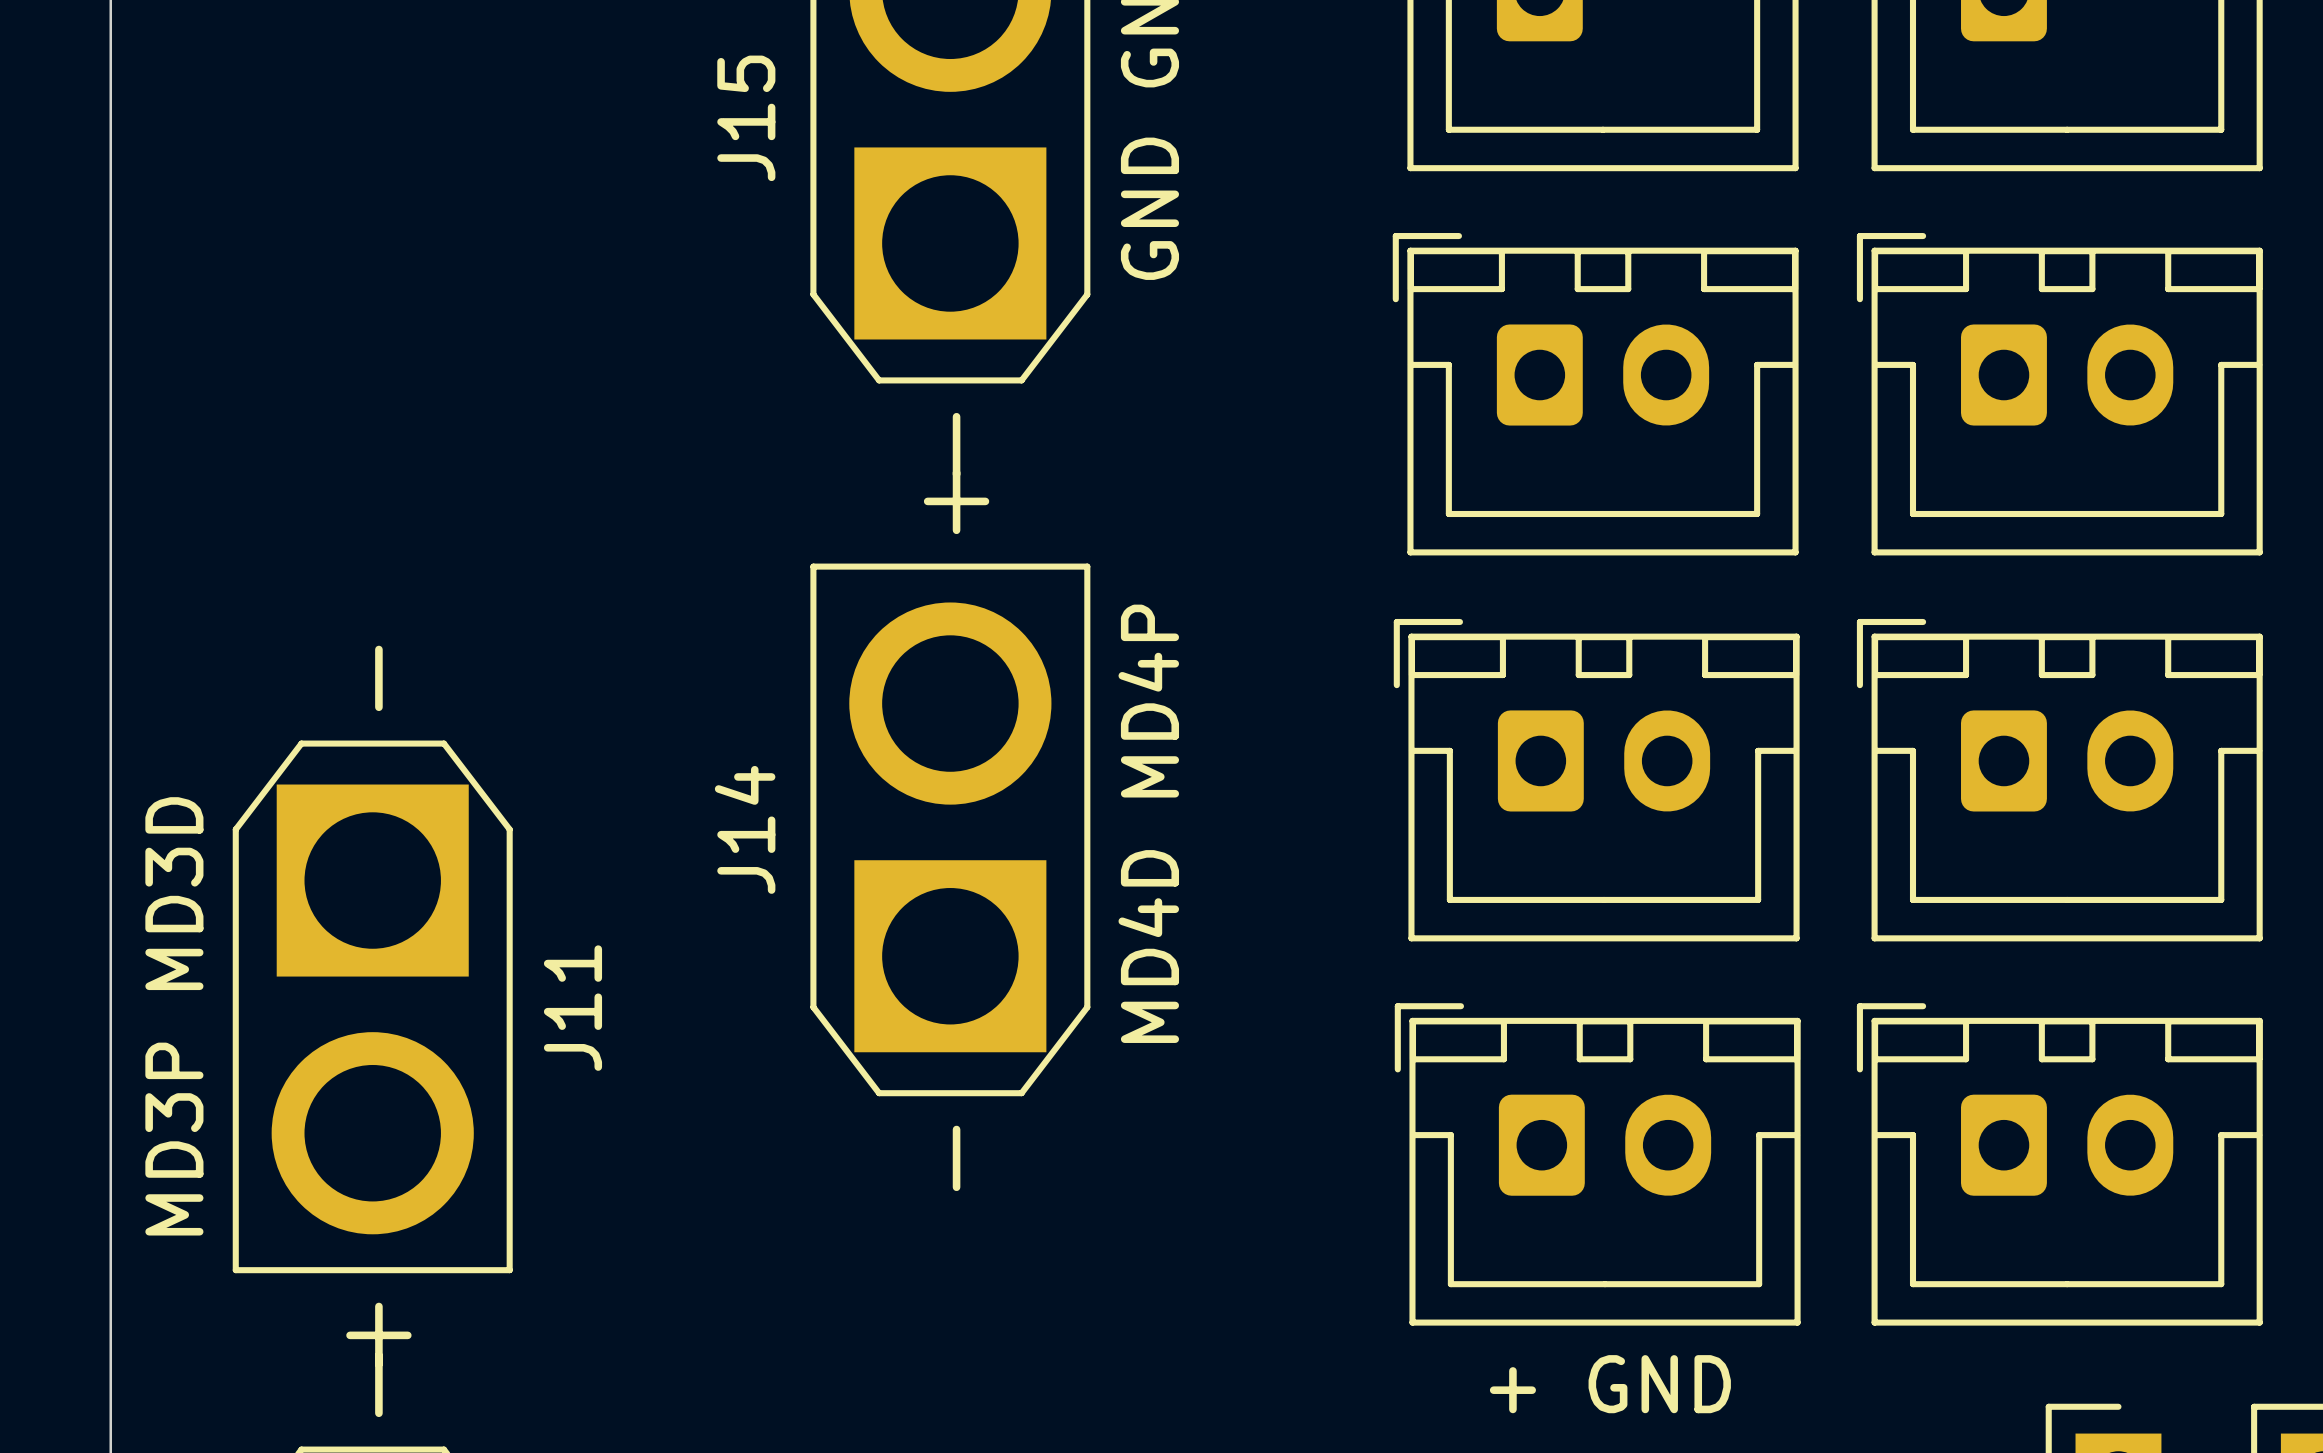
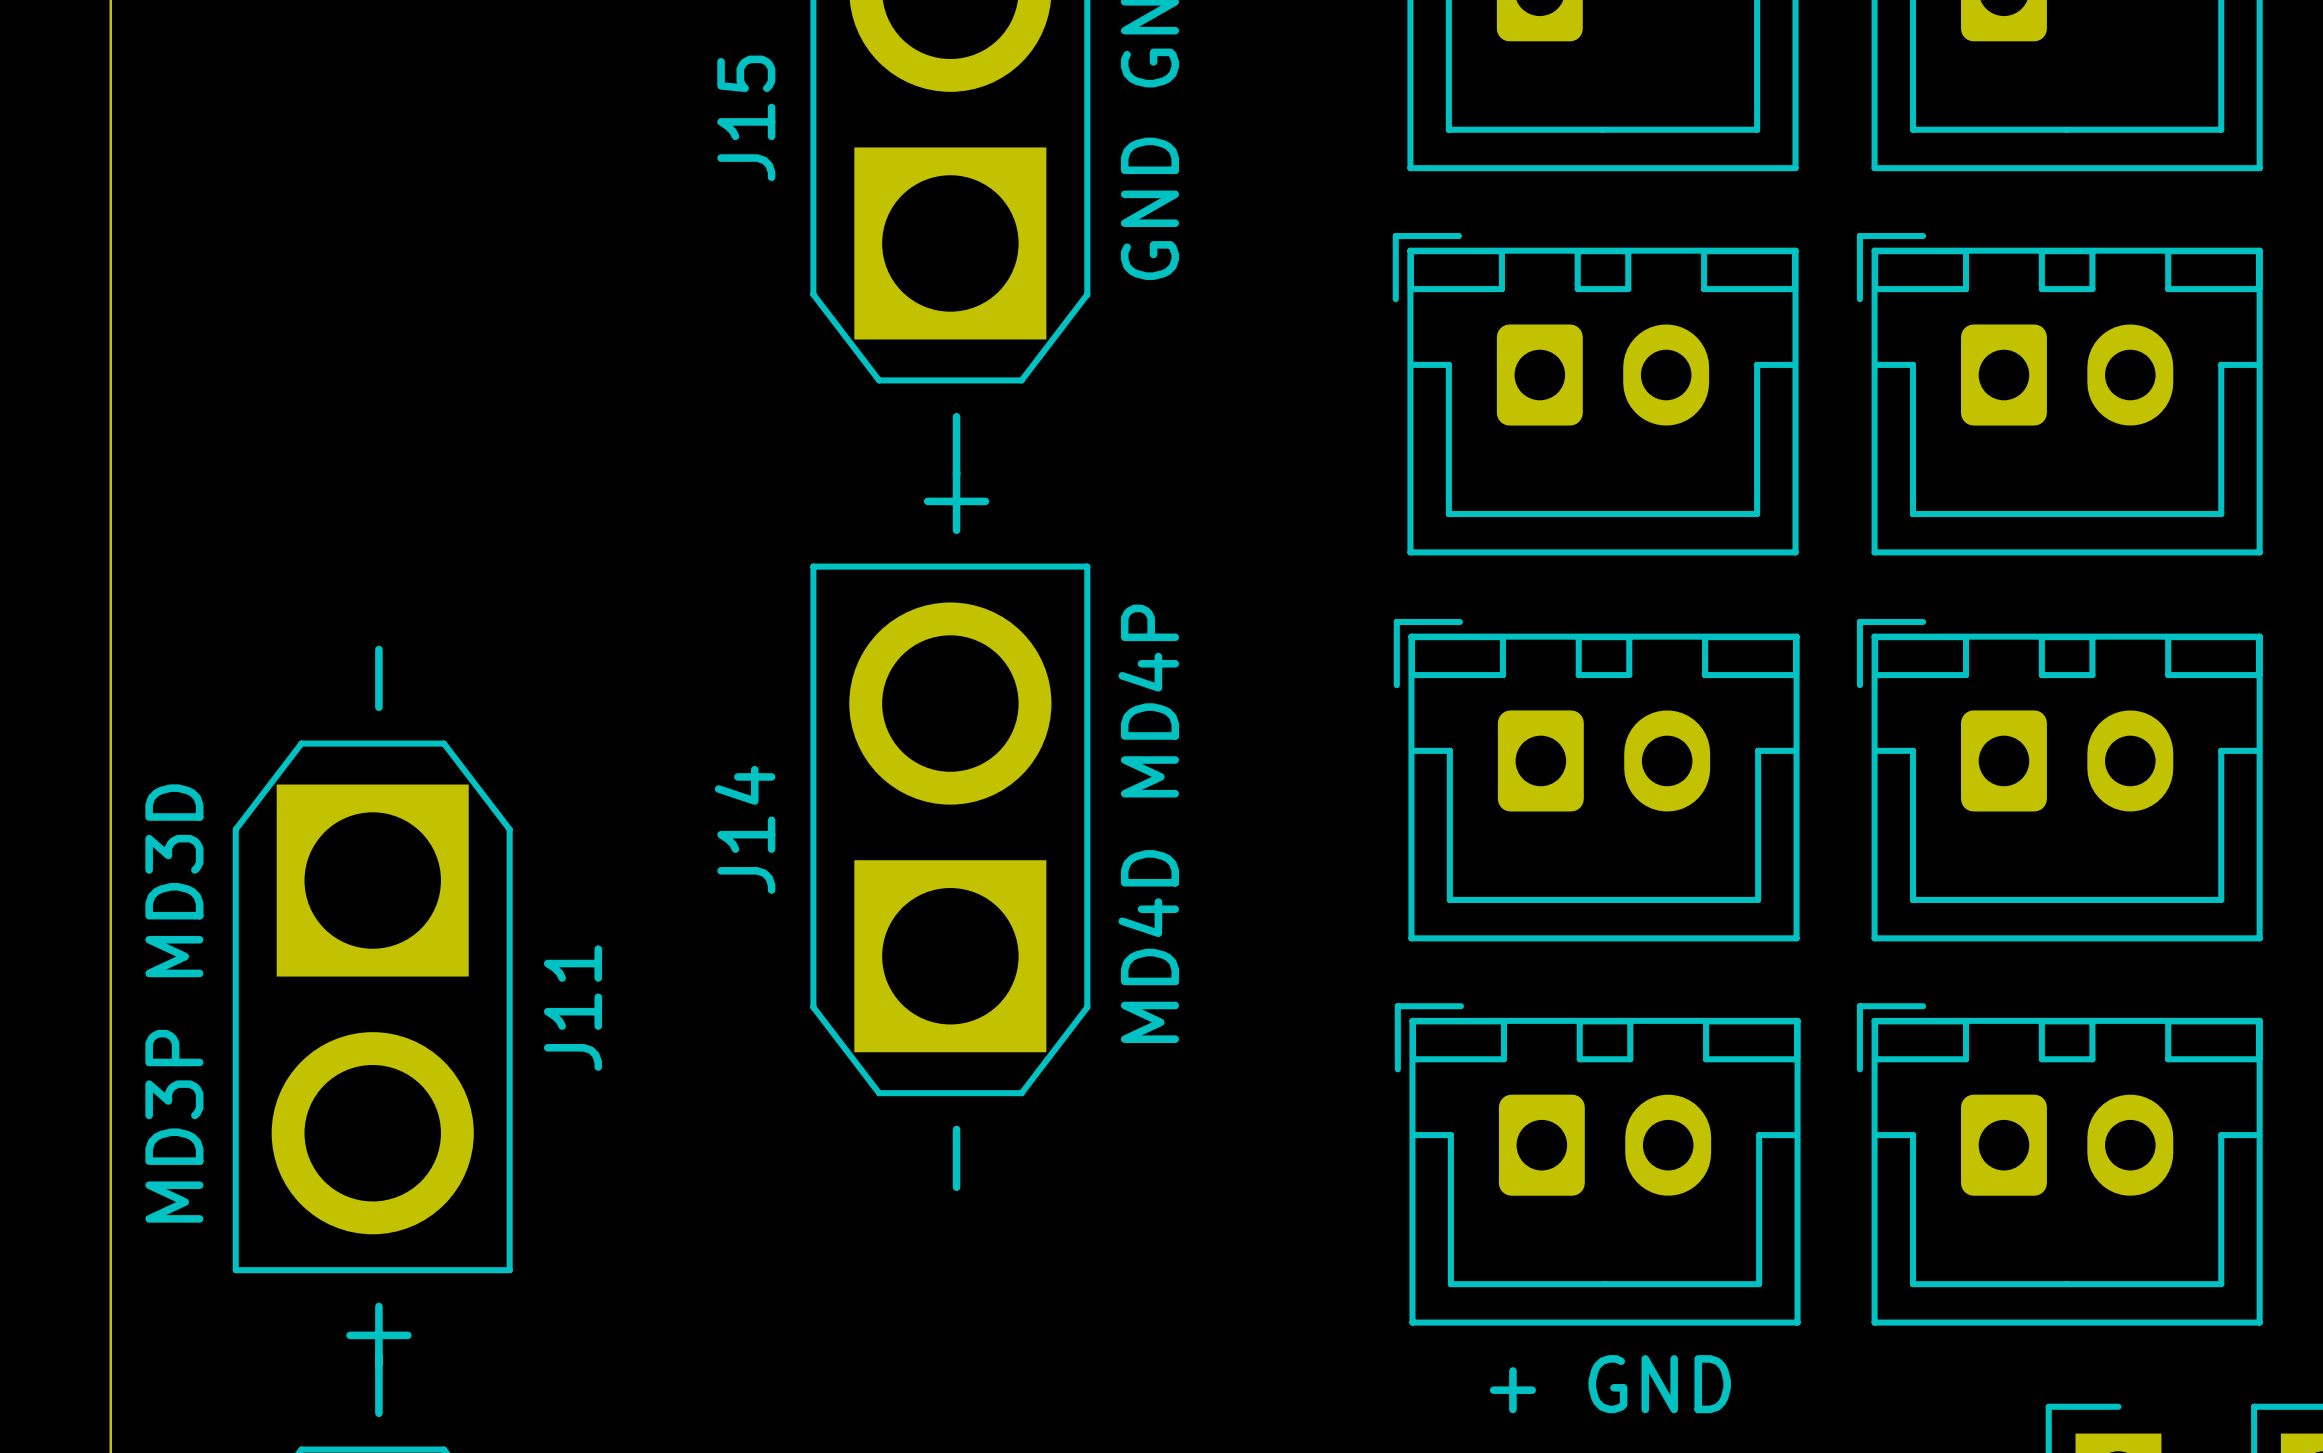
text position: MD3P MD3D (174, 1016) -> MD3P MD3D (174, 1003)

